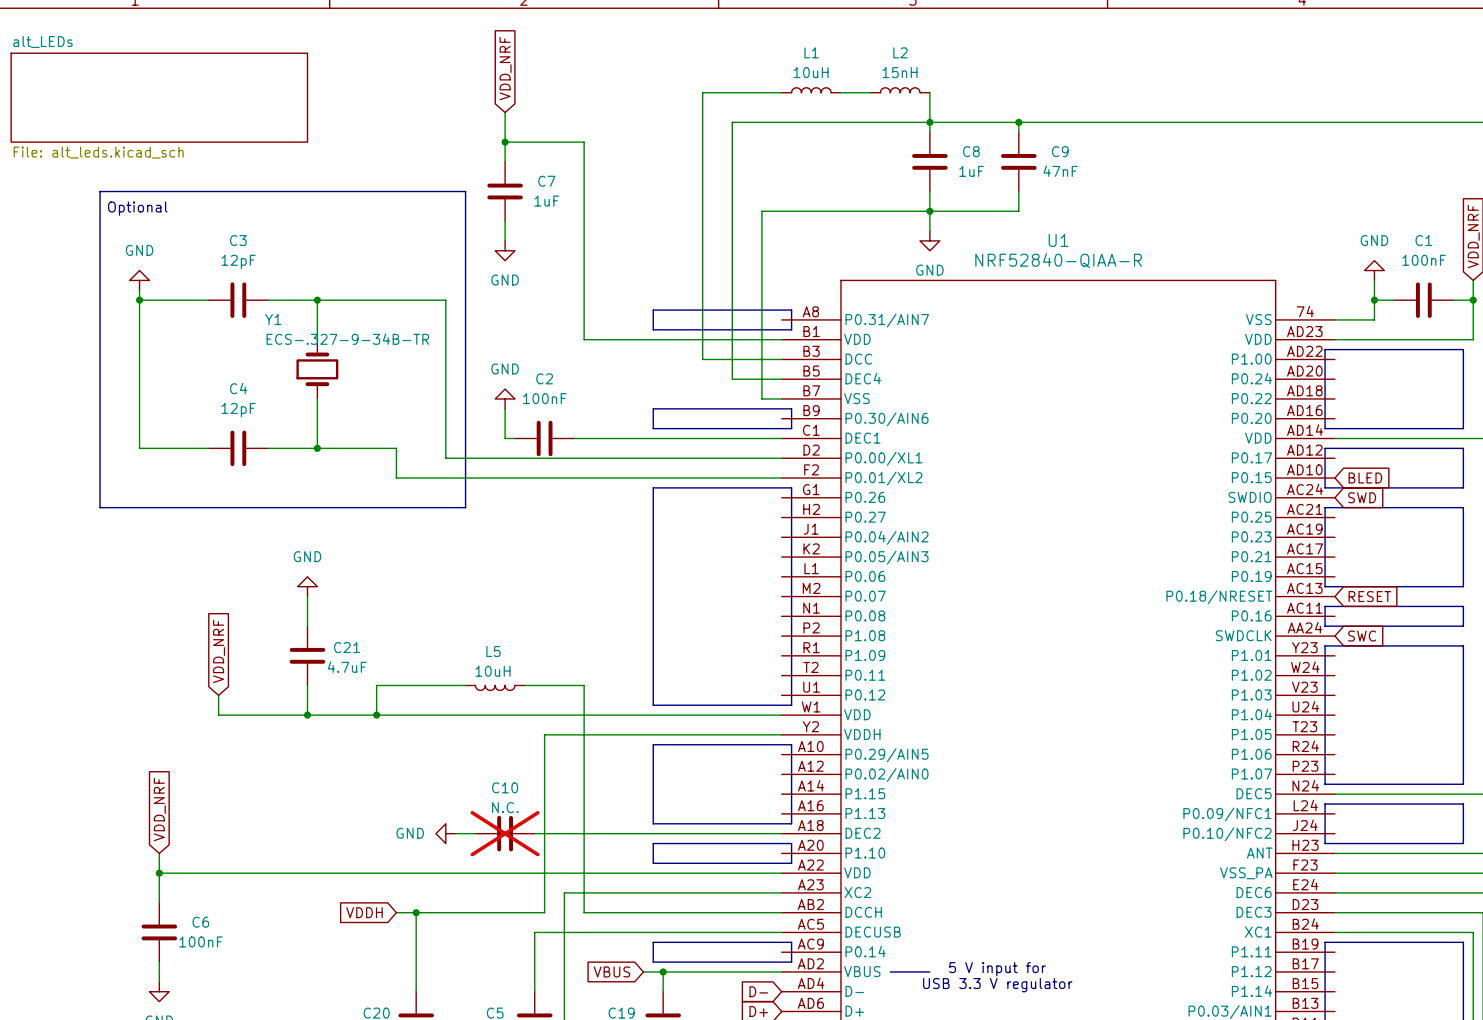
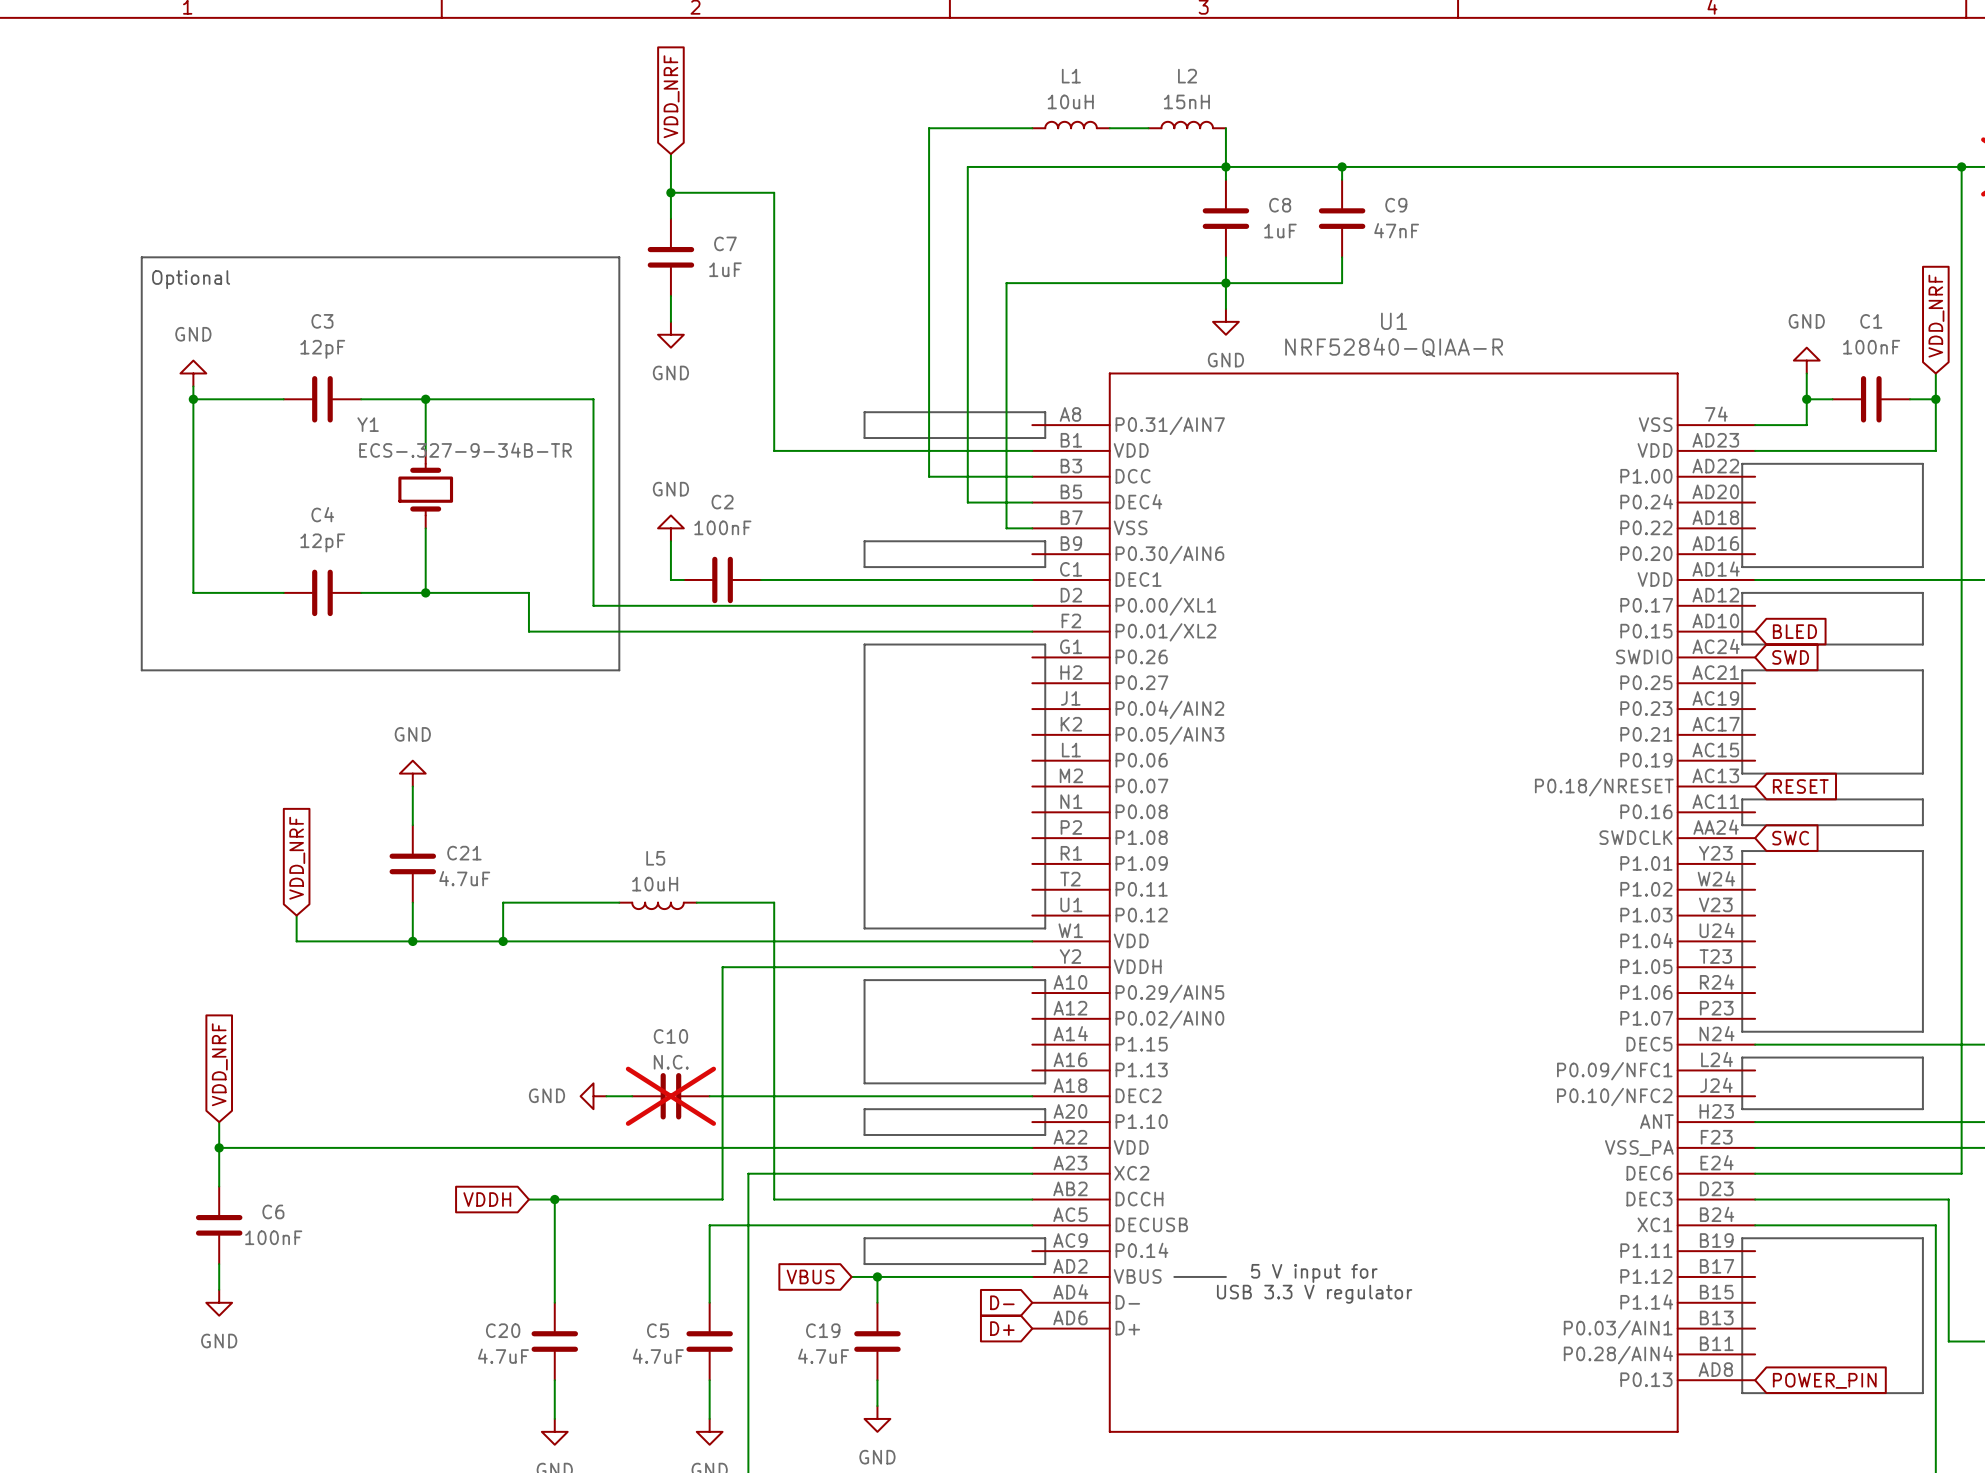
sheet alt_LEDs: File: alt_leds.kicad_sch (159, 97) -> none

